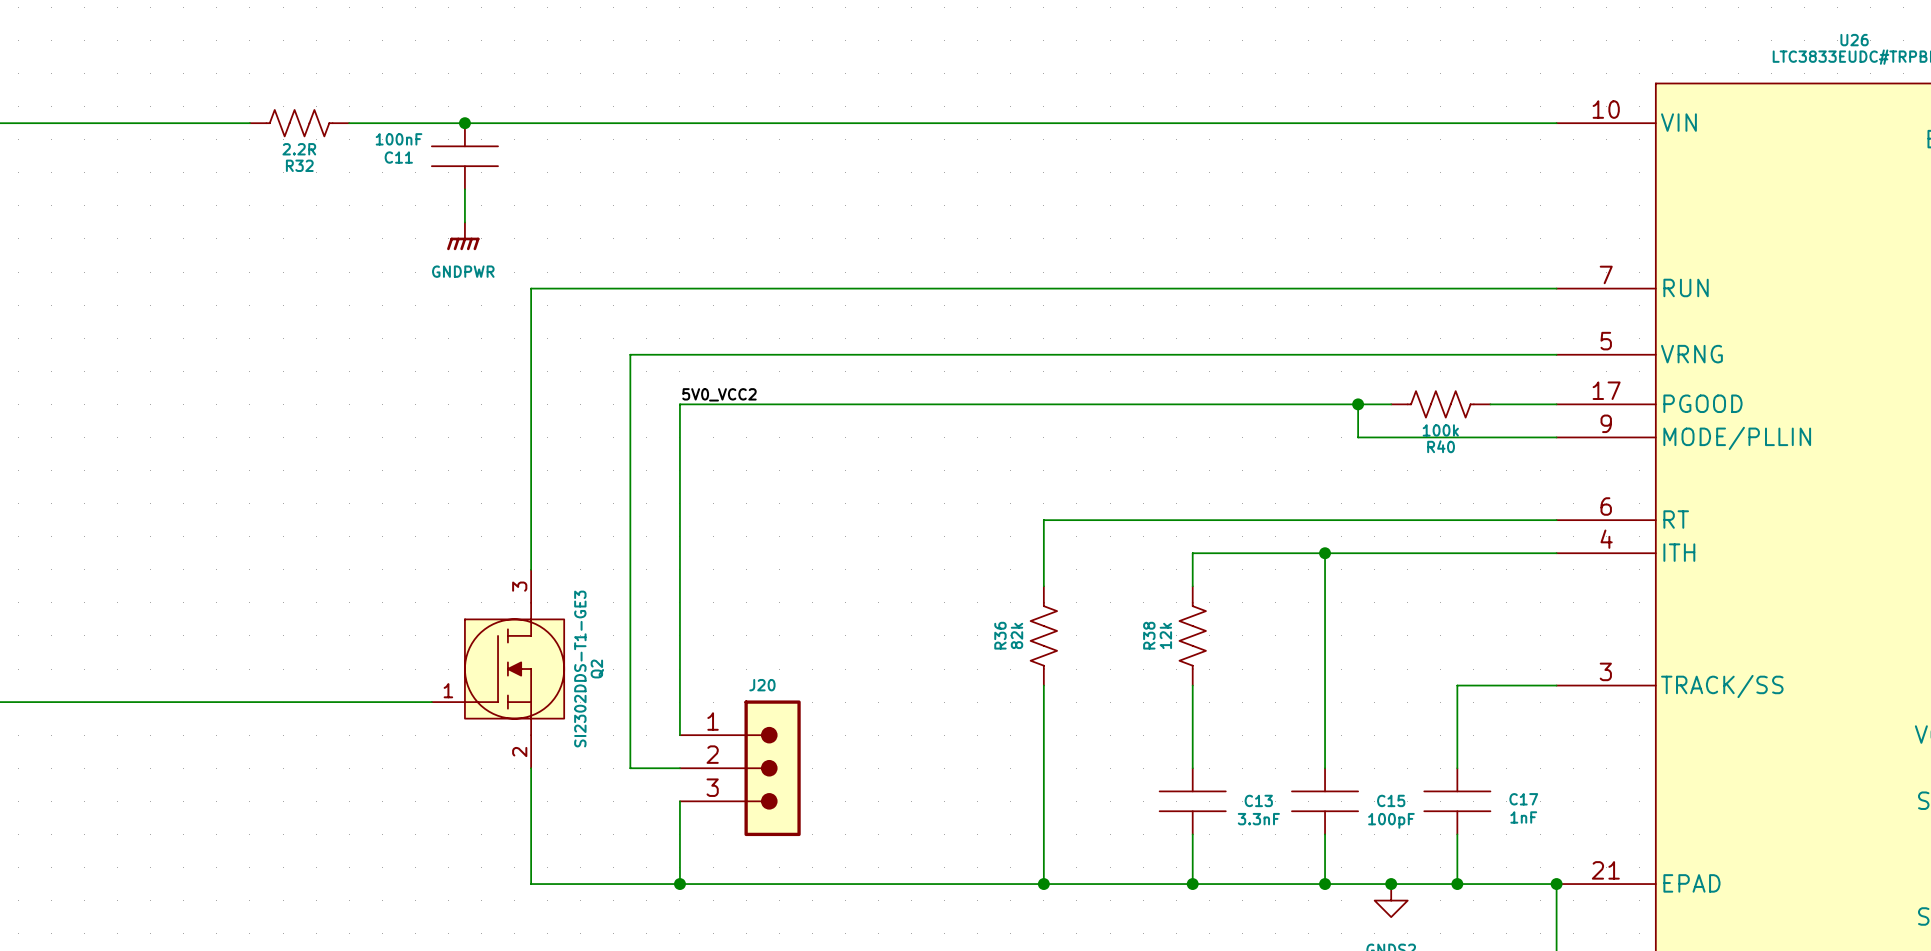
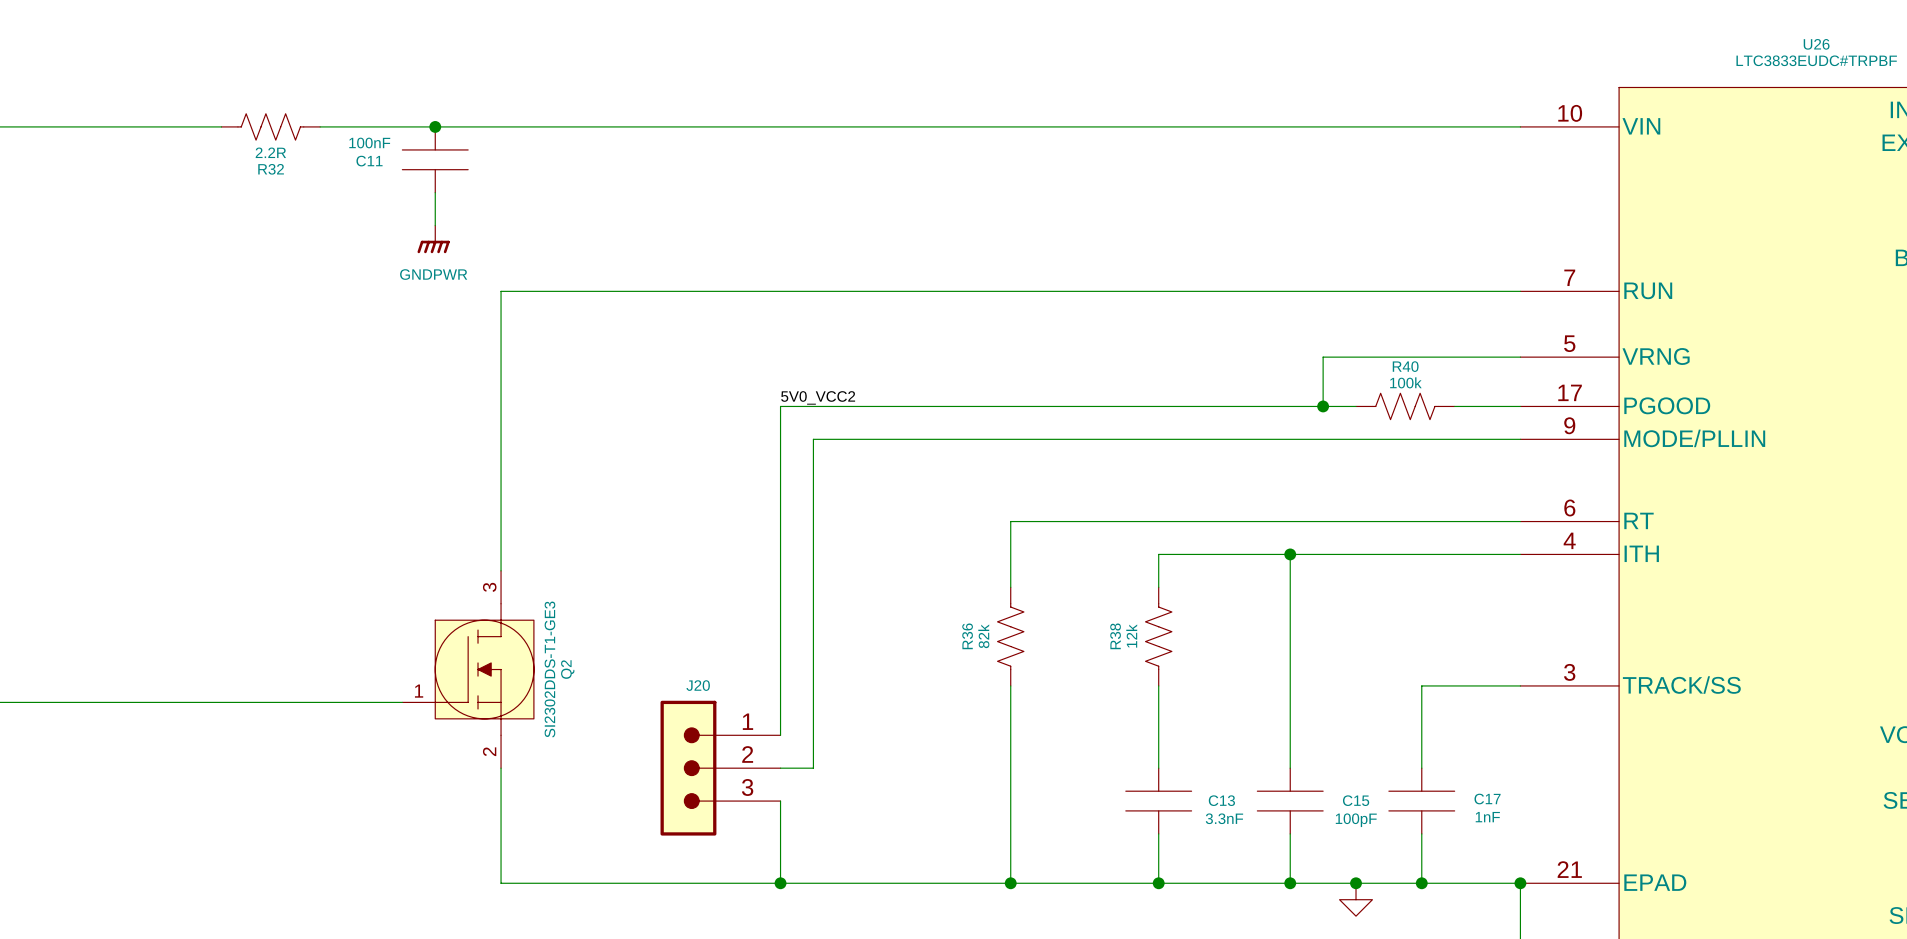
wire: (1358, 354) (630, 354) (630, 768) (679, 768) -> none
label position: 5V0_VCC2 (719, 394) -> 5V0_VCC2 (818, 397)
wire: (812, 404) (679, 404) (679, 735) -> (780, 406) (780, 735)
wire: (1358, 404) (1358, 437) -> (1323, 406) (1323, 357)
R40 value position: 100k (1440, 430) -> 100k (1405, 382)
wire: none -> (1323, 439) (813, 439) (813, 768) (780, 768)
R40 name position: R40 (1441, 446) -> R40 (1405, 366)
J20 flip: as is (772, 768) -> left-right (688, 768)
wire: (679, 801) (679, 884) -> (780, 801) (780, 883)
junction: (679, 884) -> none
junction: none -> (780, 883)

